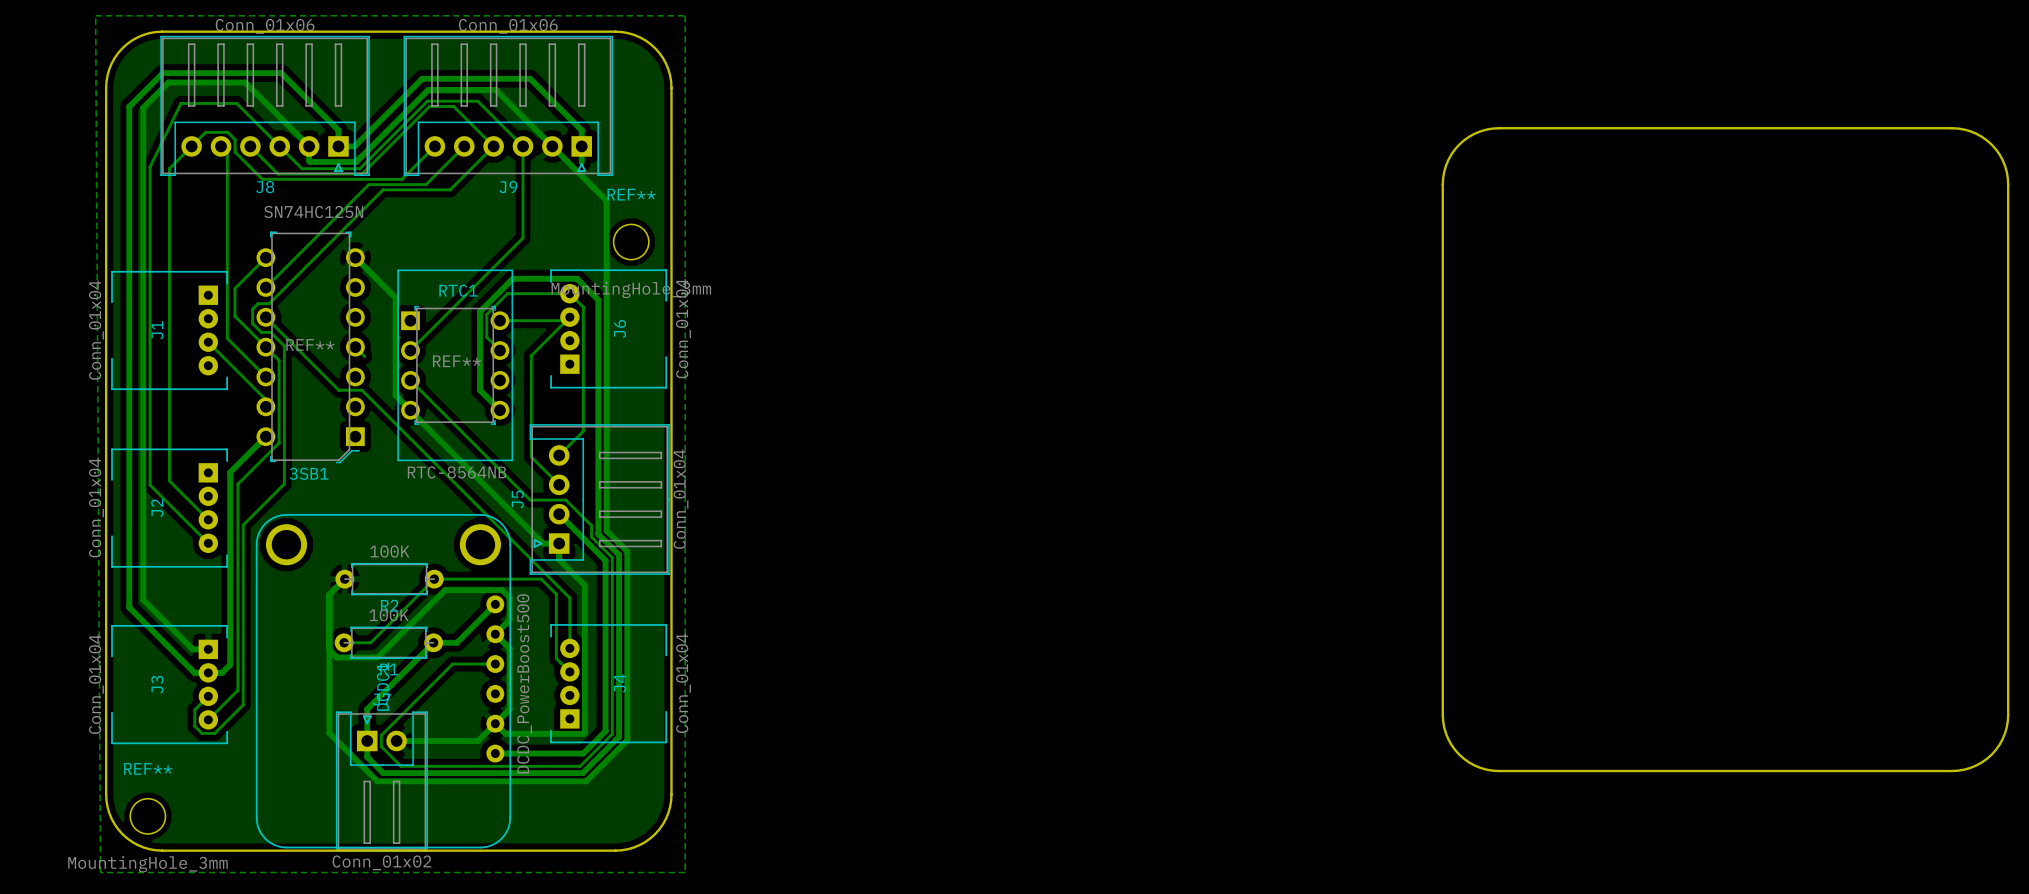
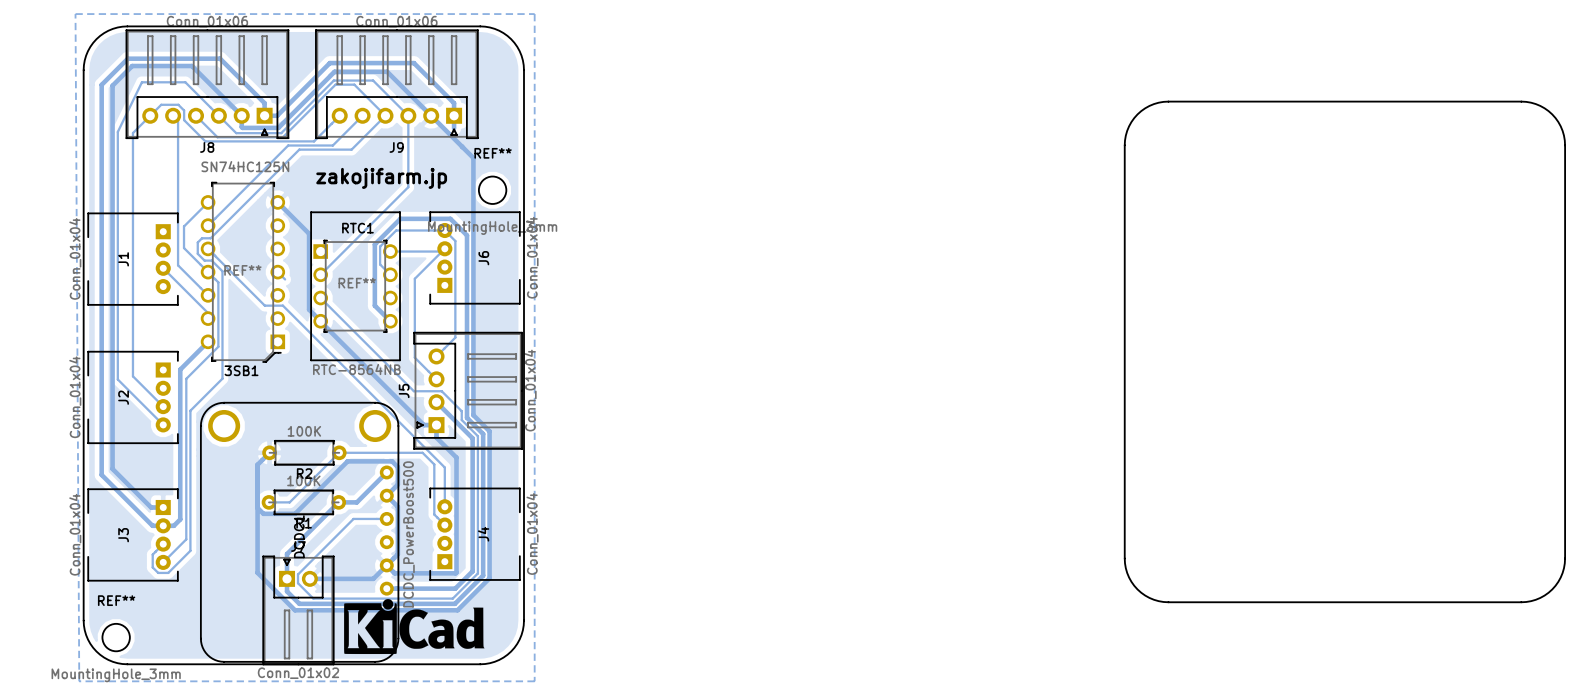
text: none -> zakojifarm.jp (381, 178)
drawing: none -> [344, 599, 485, 655]

